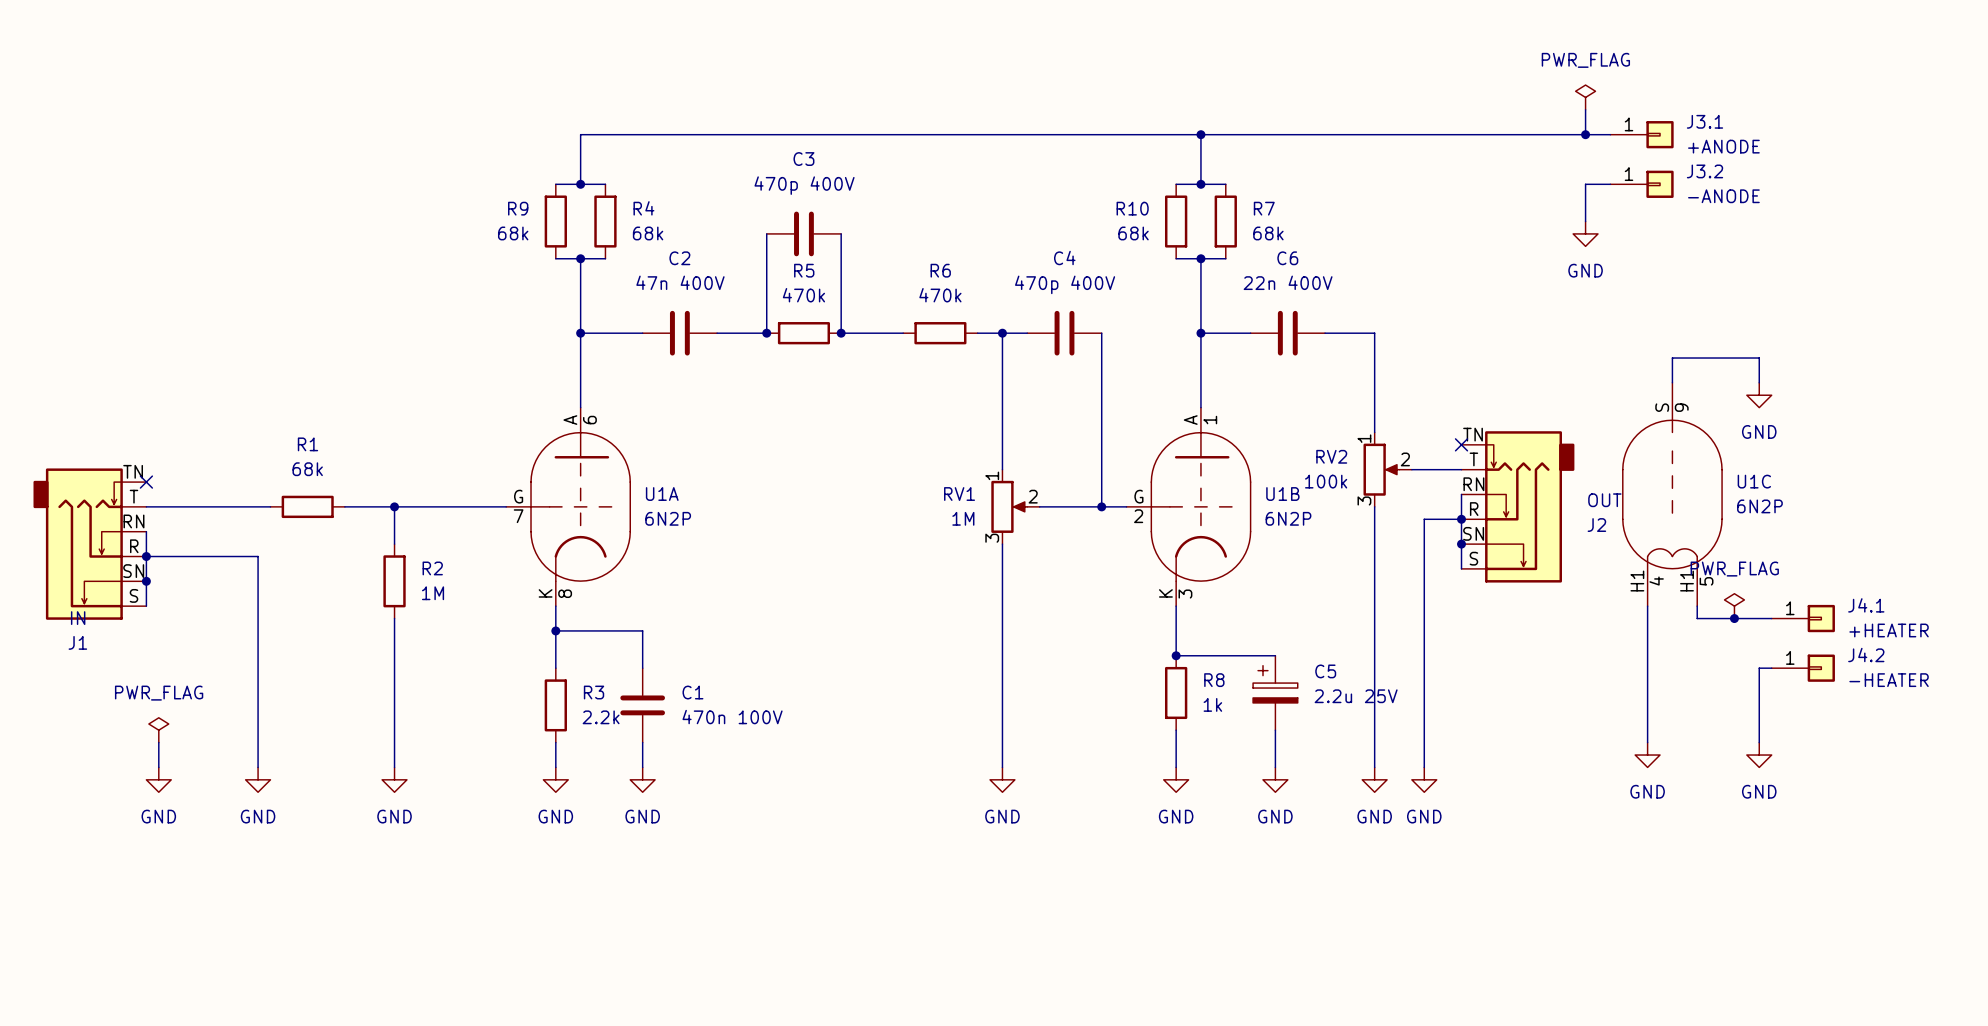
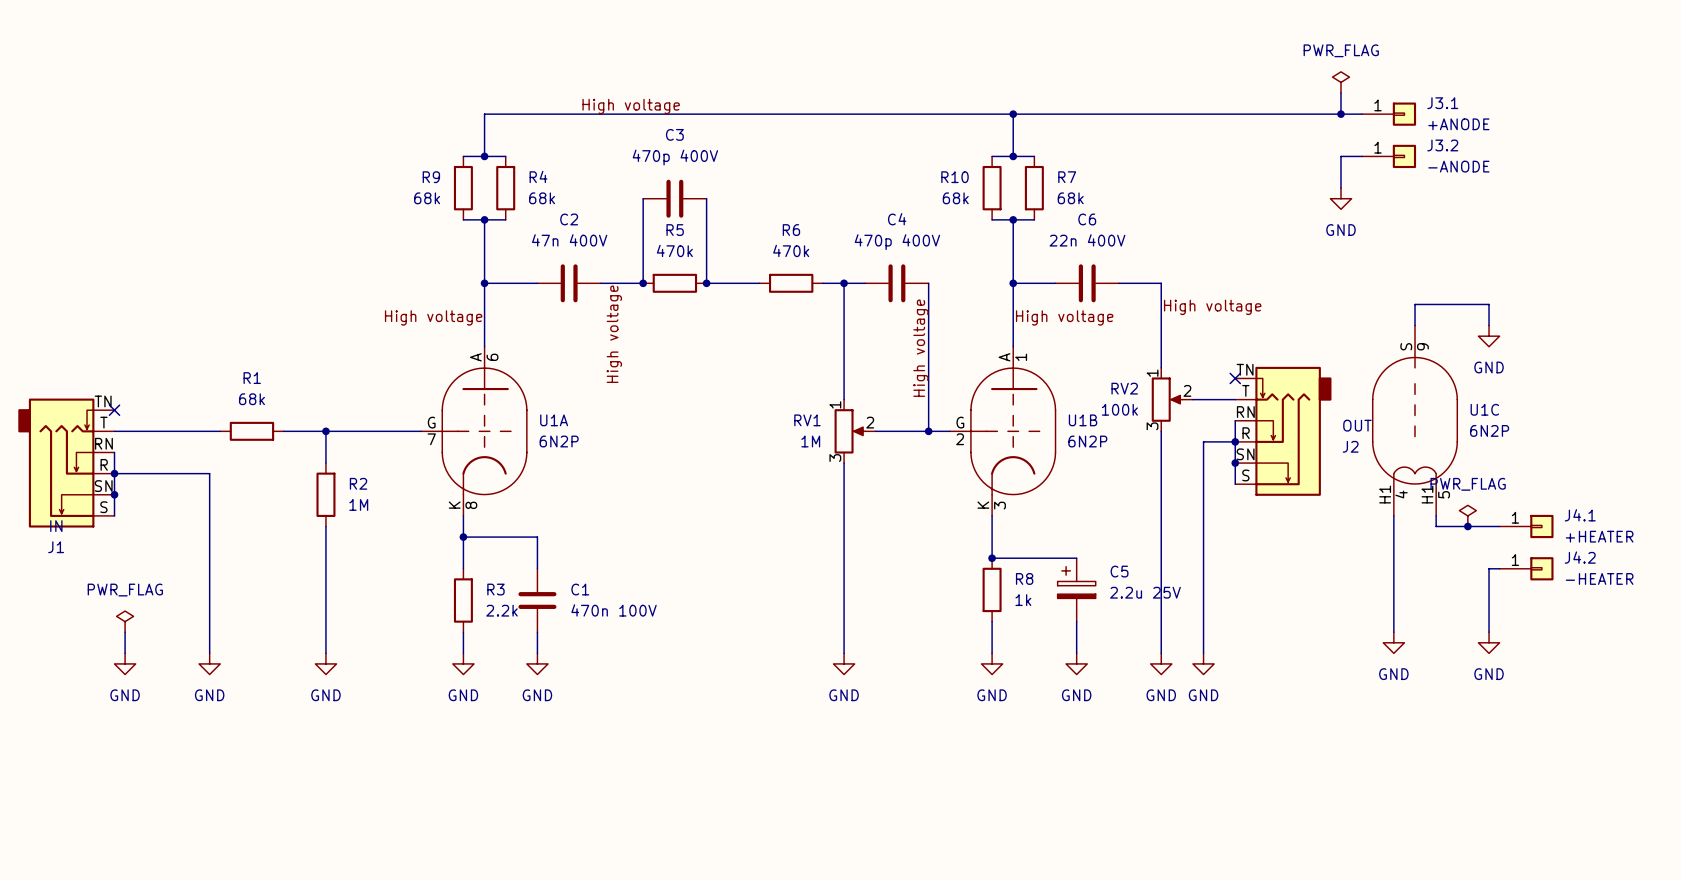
label: none -> High voltage (631, 106)
label: none -> High voltage (1212, 307)
label: none -> High voltage (433, 317)
label: none -> High voltage (1064, 317)
label: none -> High voltage (614, 334)
label: none -> High voltage (920, 348)

